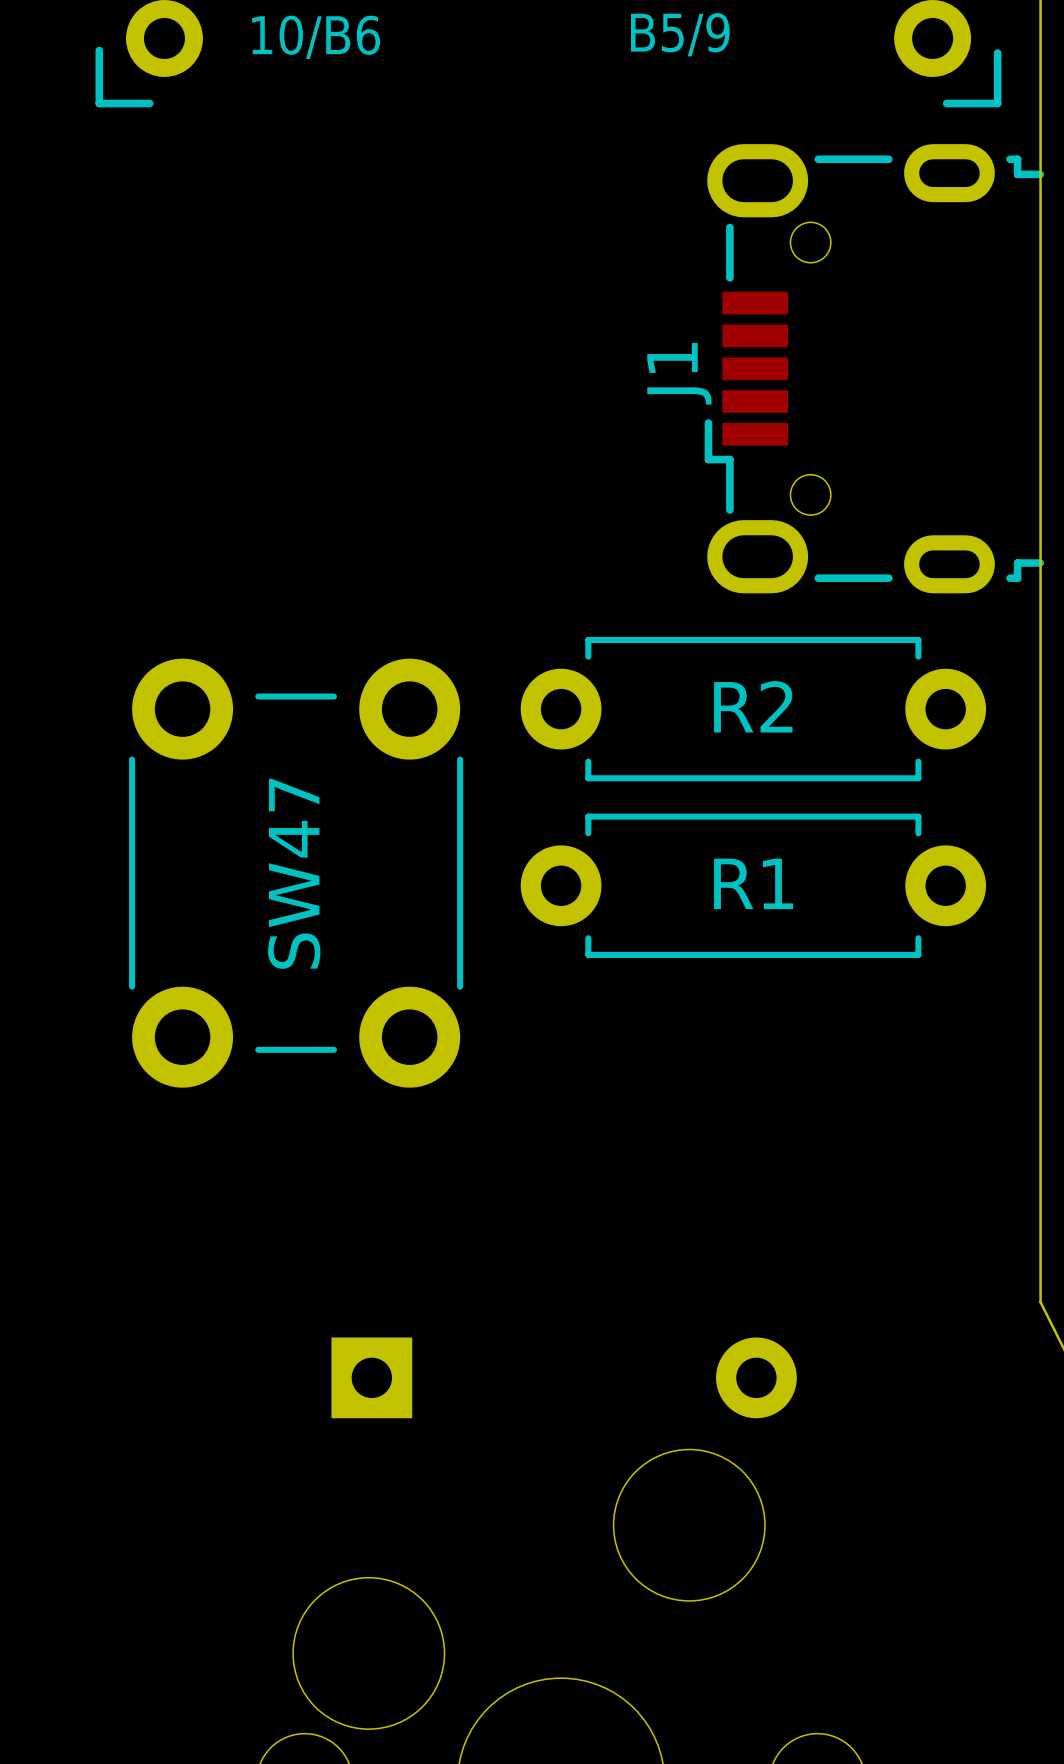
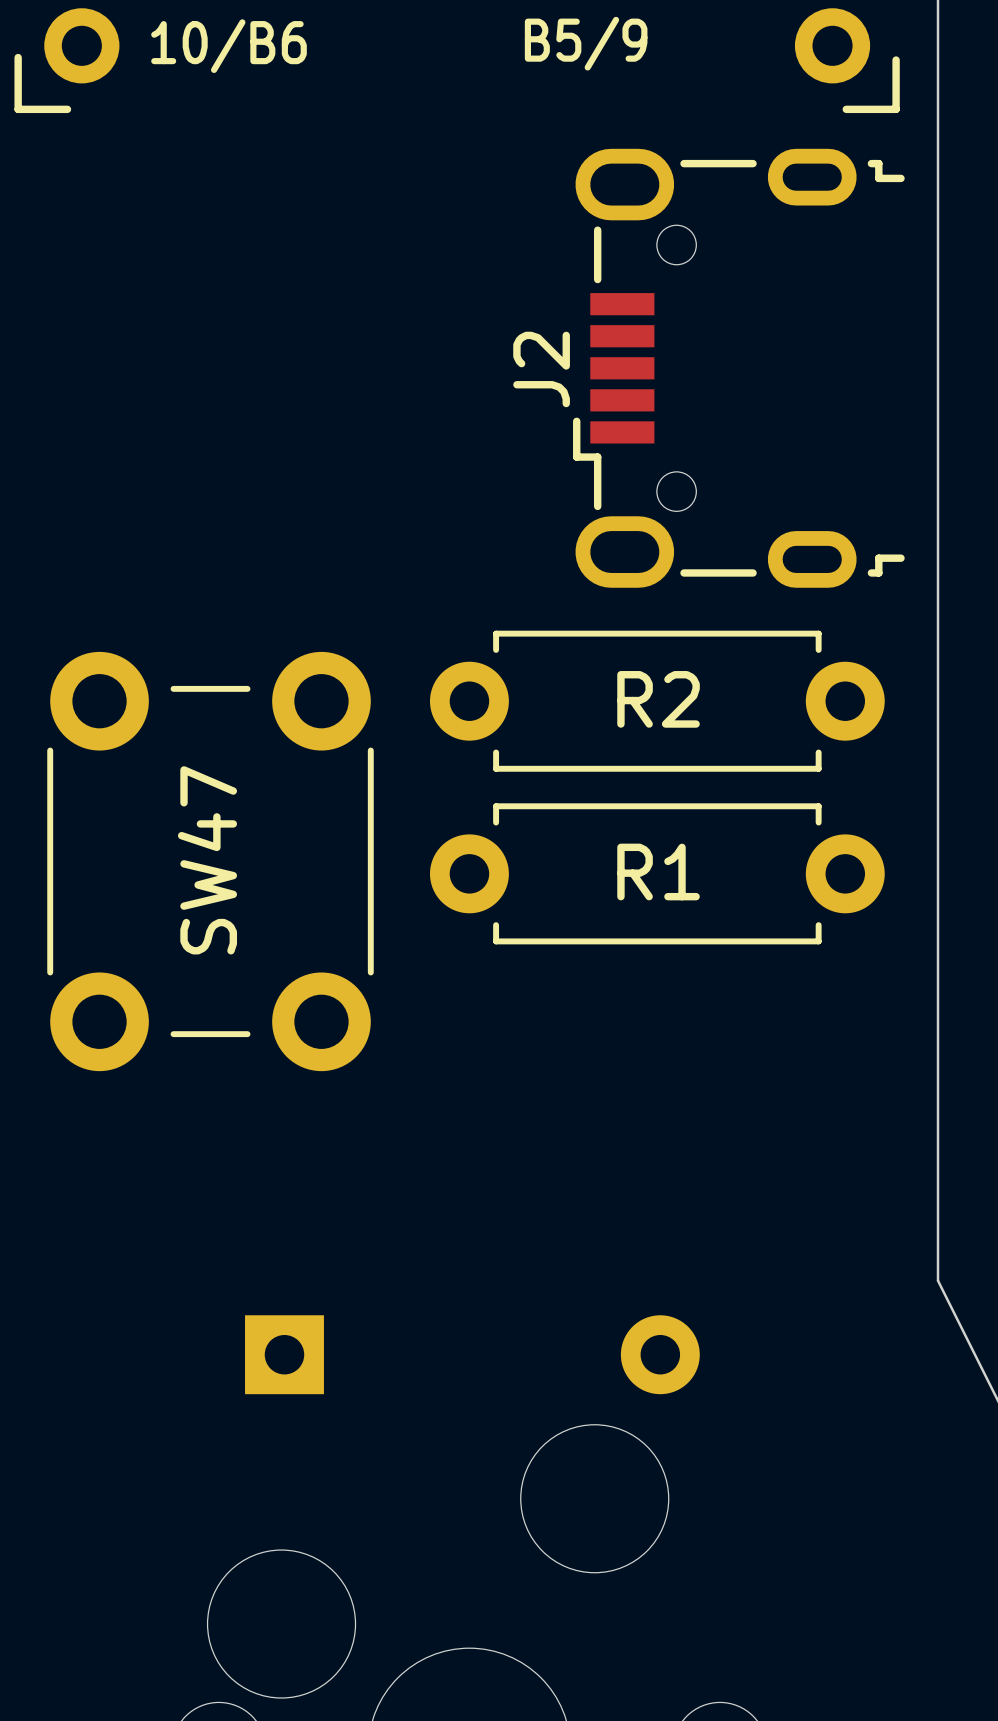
J1 position: (874, 368) -> (738, 368)
J1 name: J1 (679, 373) -> J2 (541, 369)

